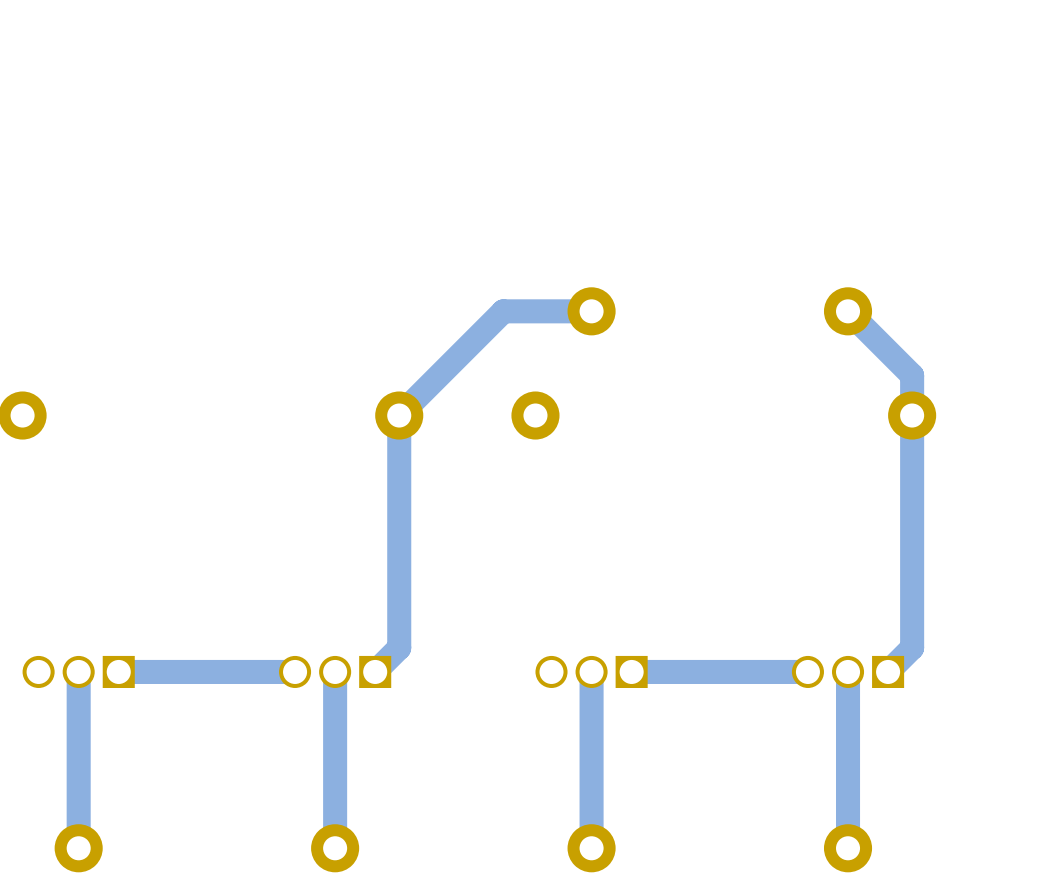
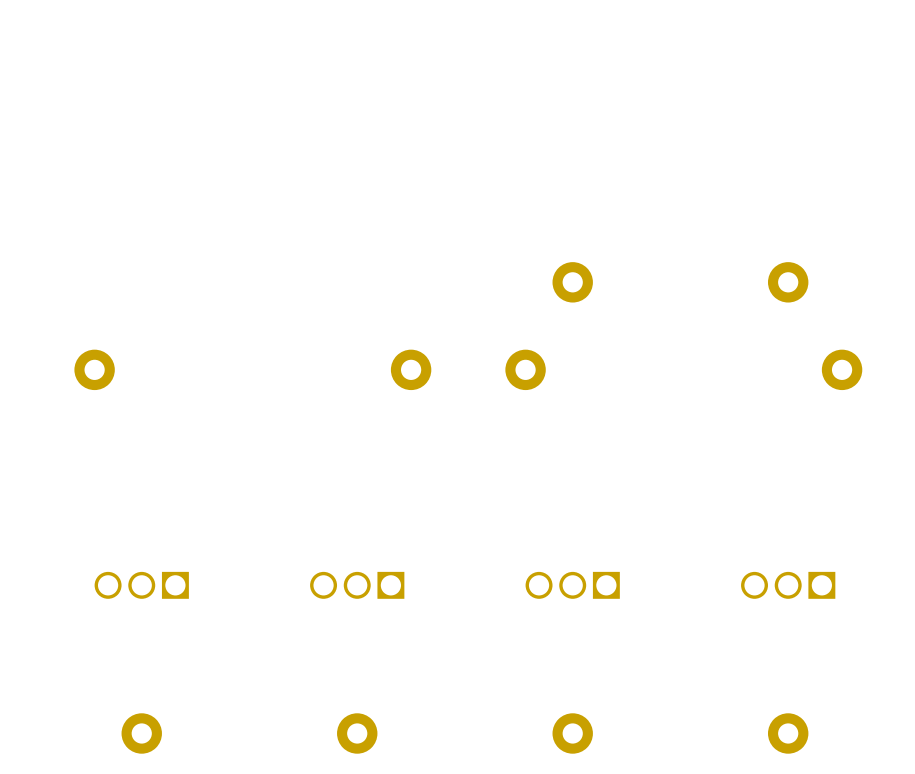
bottom track: (591, 311) (503, 311) (399, 415) (399, 647) (375, 671) -> none
bottom track: (848, 311) (912, 375) (912, 647) (888, 671) -> none
bottom track: (78, 671) (78, 848) -> none
bottom track: (295, 671) (118, 671) -> none
bottom track: (335, 671) (335, 848) -> none
bottom track: (591, 671) (591, 848) -> none
bottom track: (807, 671) (631, 671) -> none
bottom track: (848, 671) (848, 848) -> none

